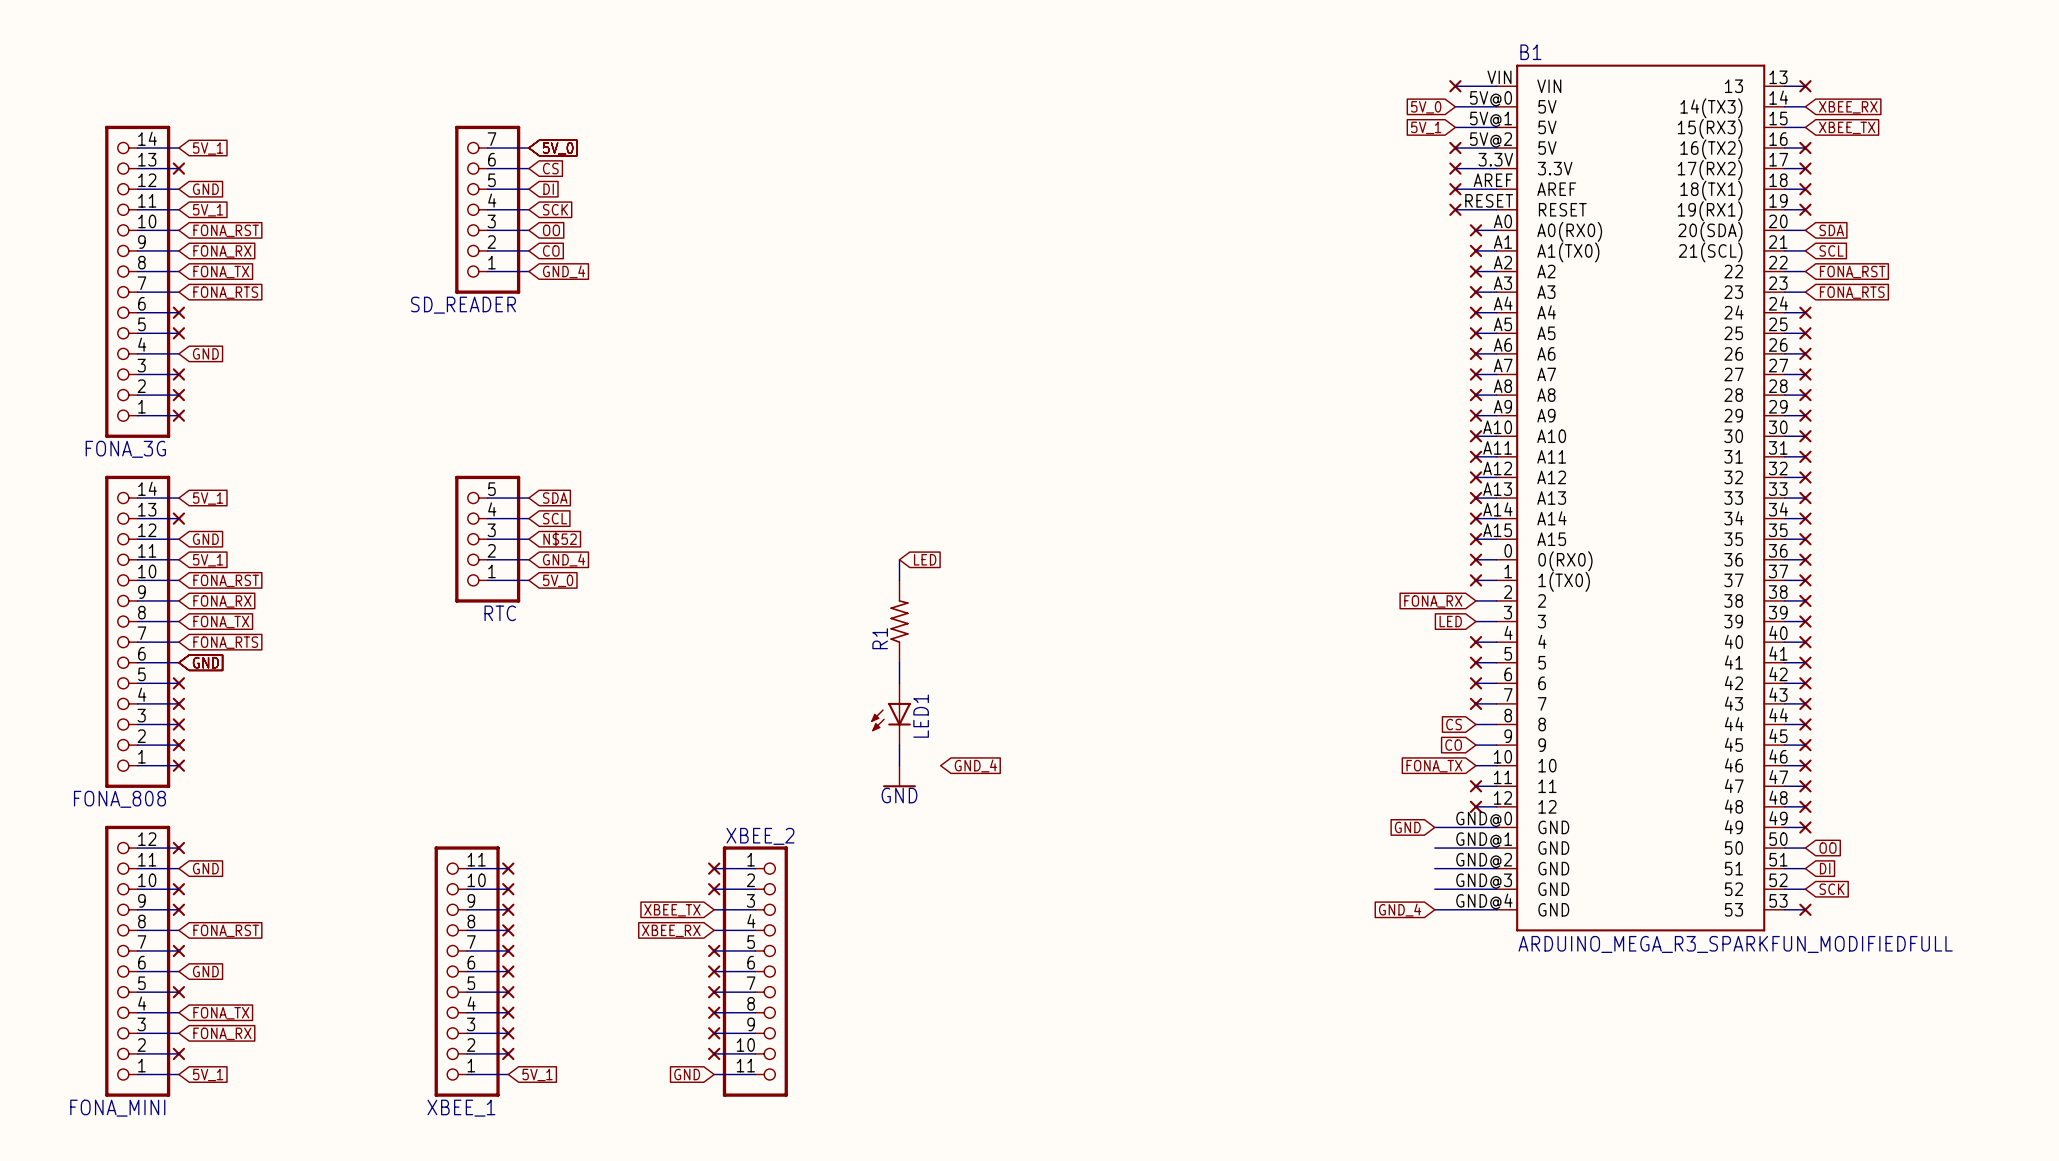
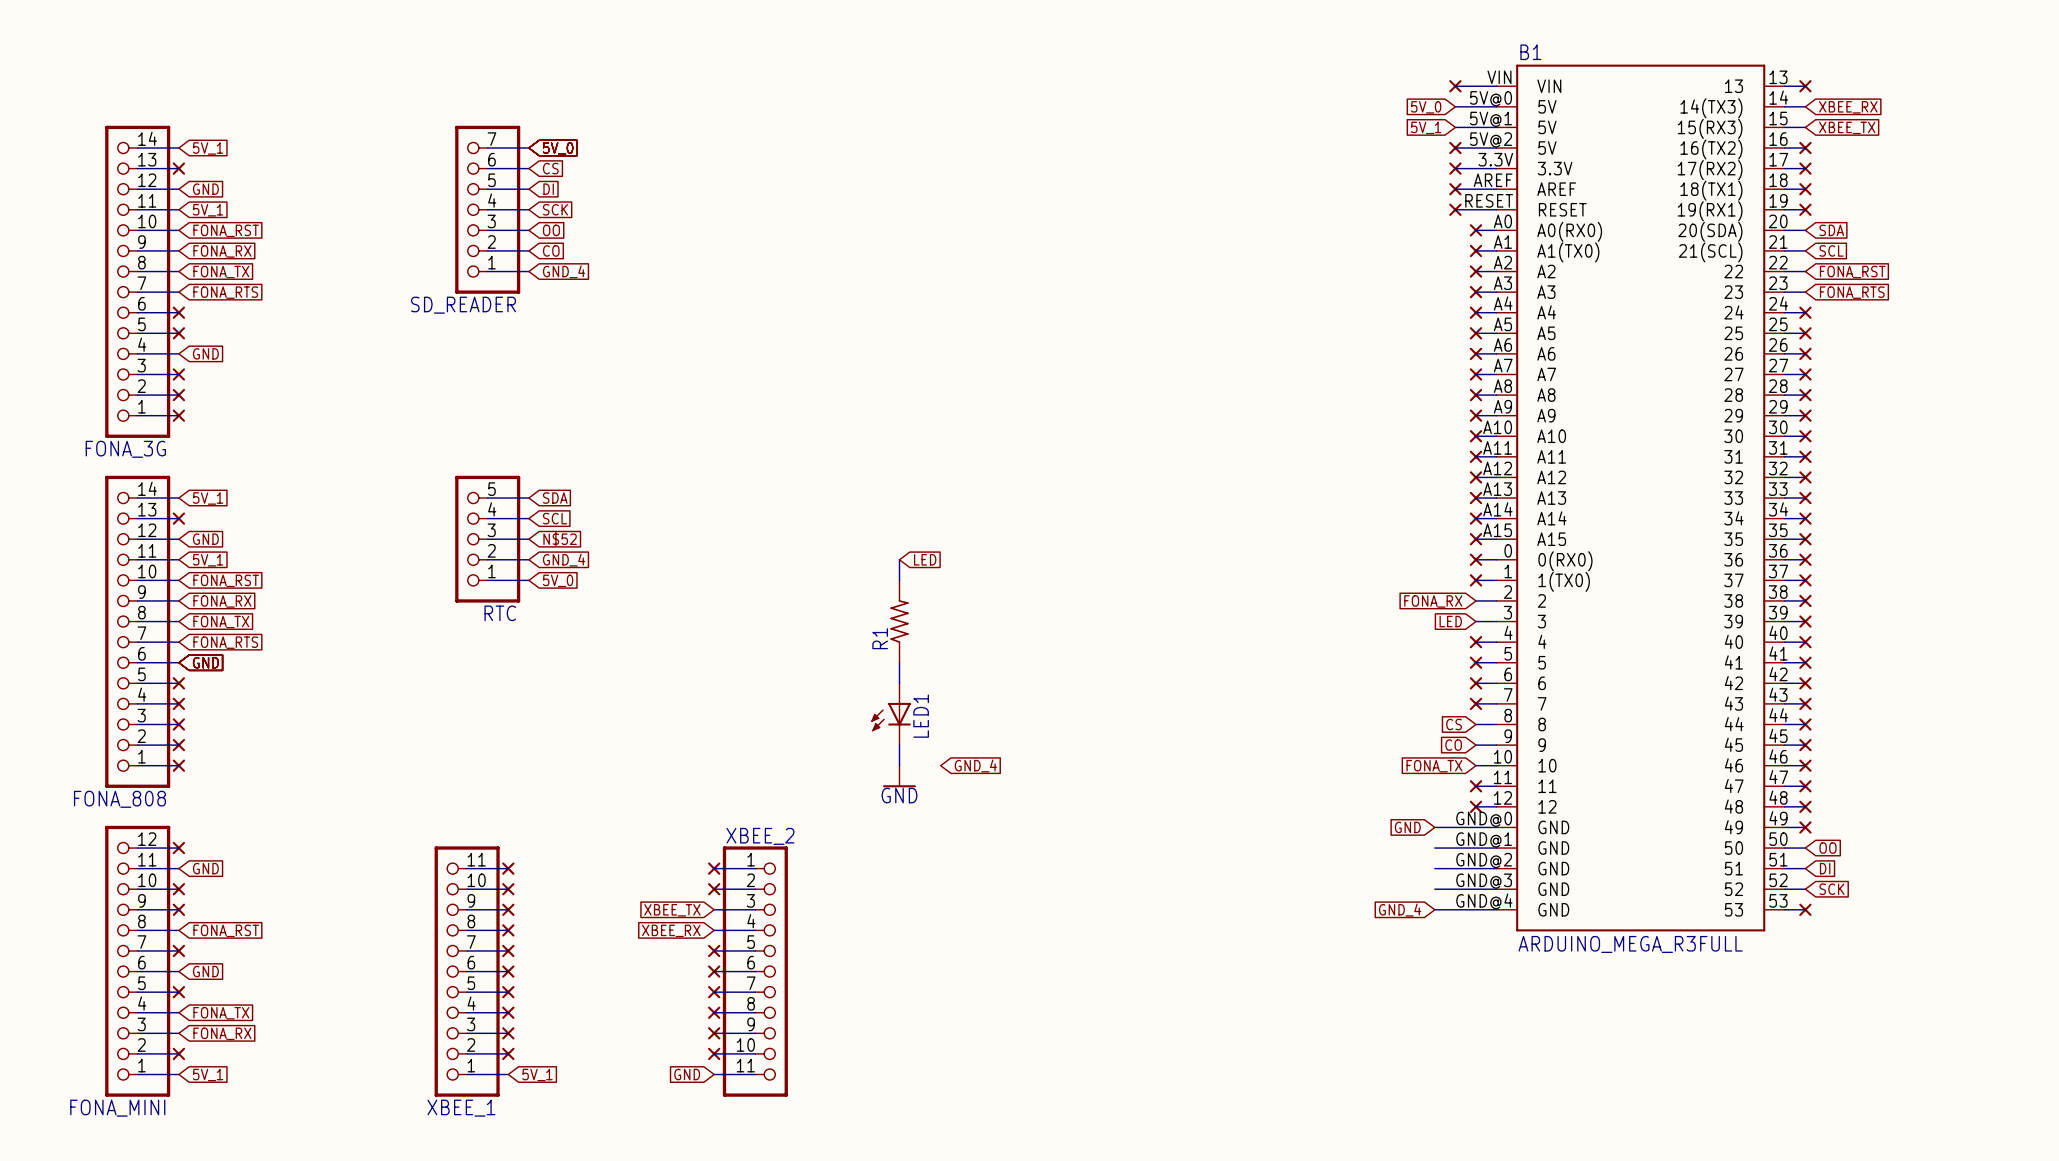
B1 value: ARDUINO_MEGA_R3_SPARKFUN_MODIFIEDFULL (1735, 944) -> ARDUINO_MEGA_R3FULL (1630, 944)

